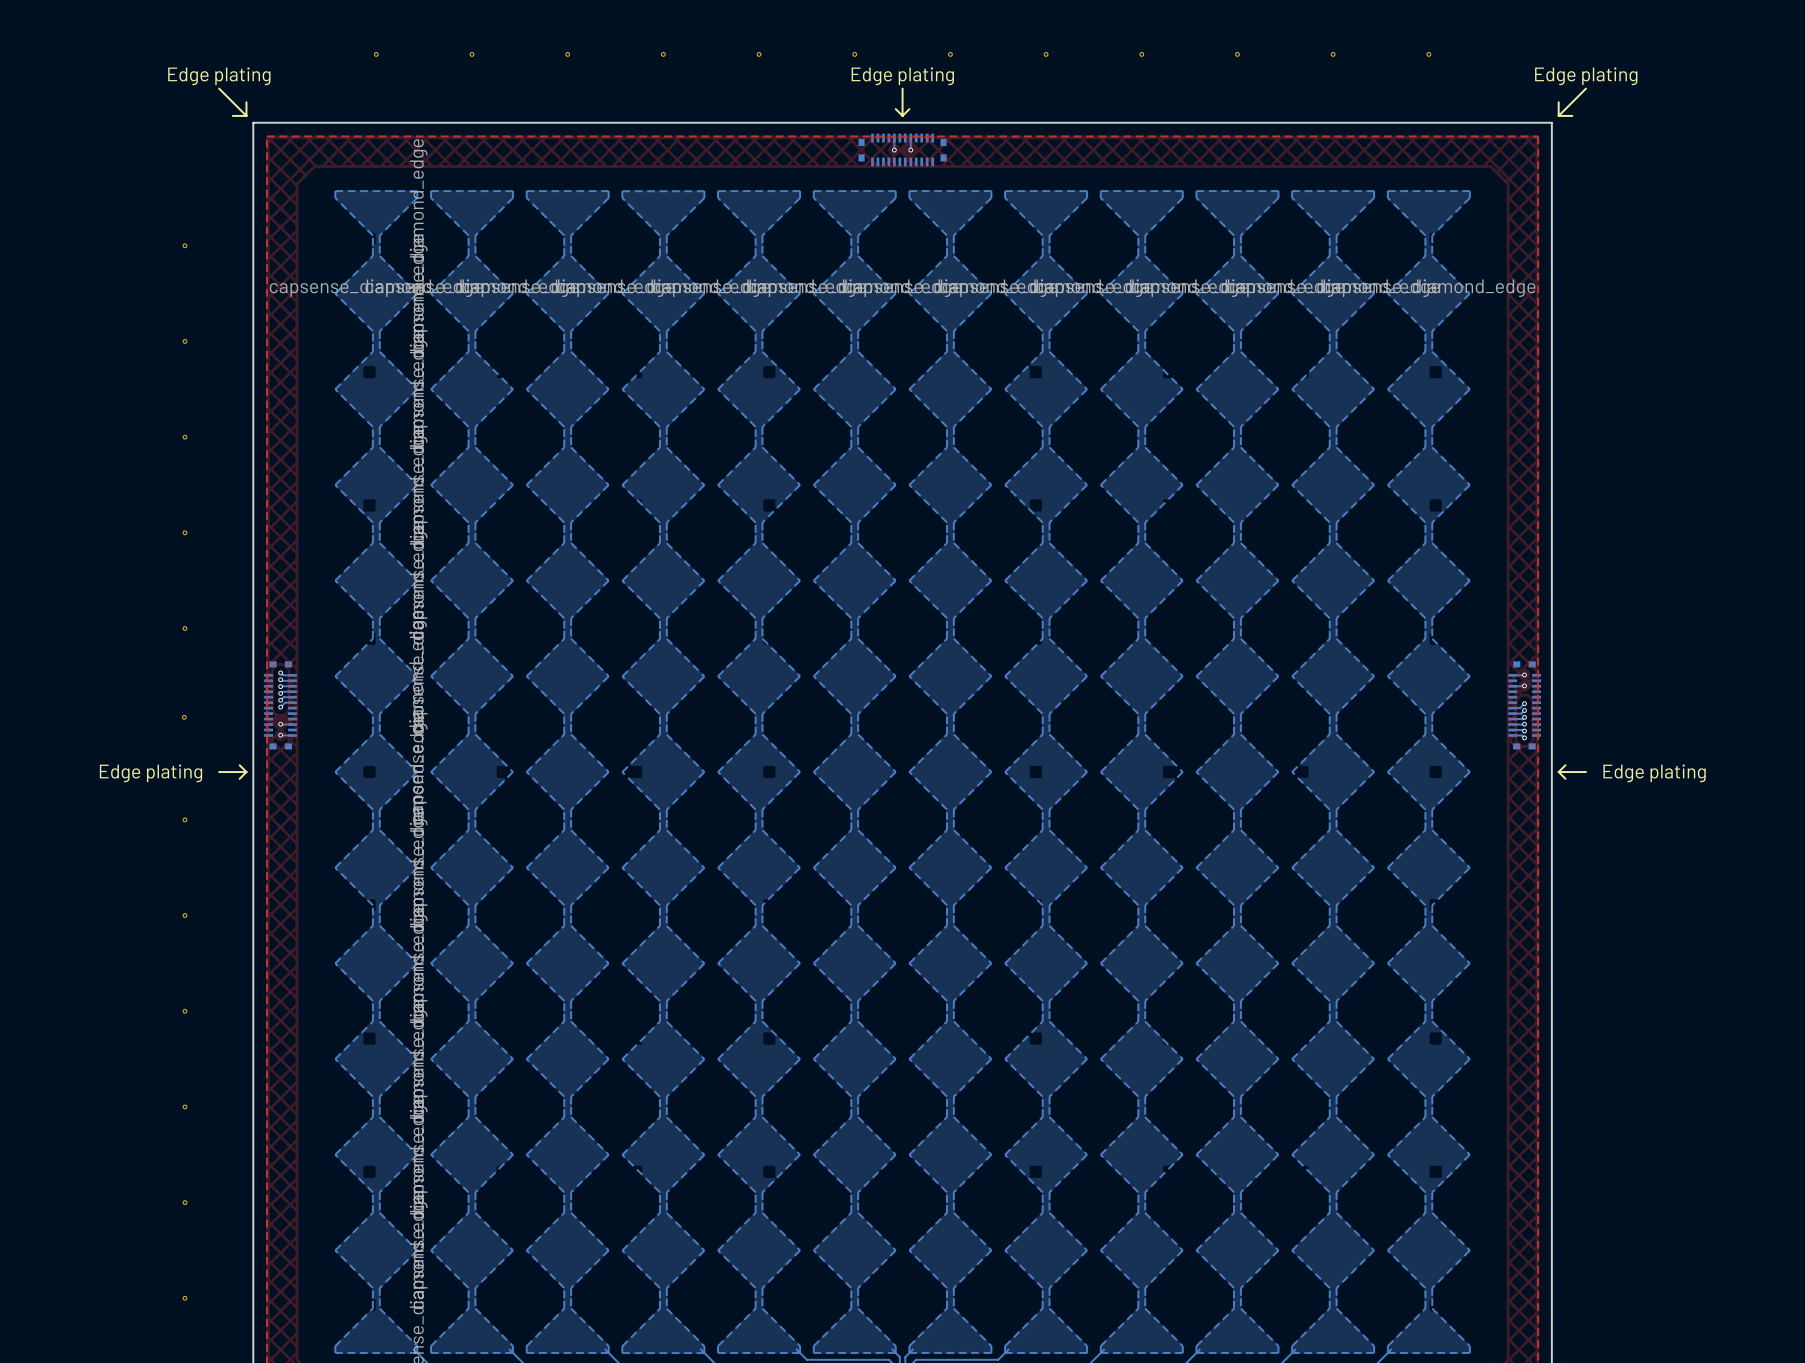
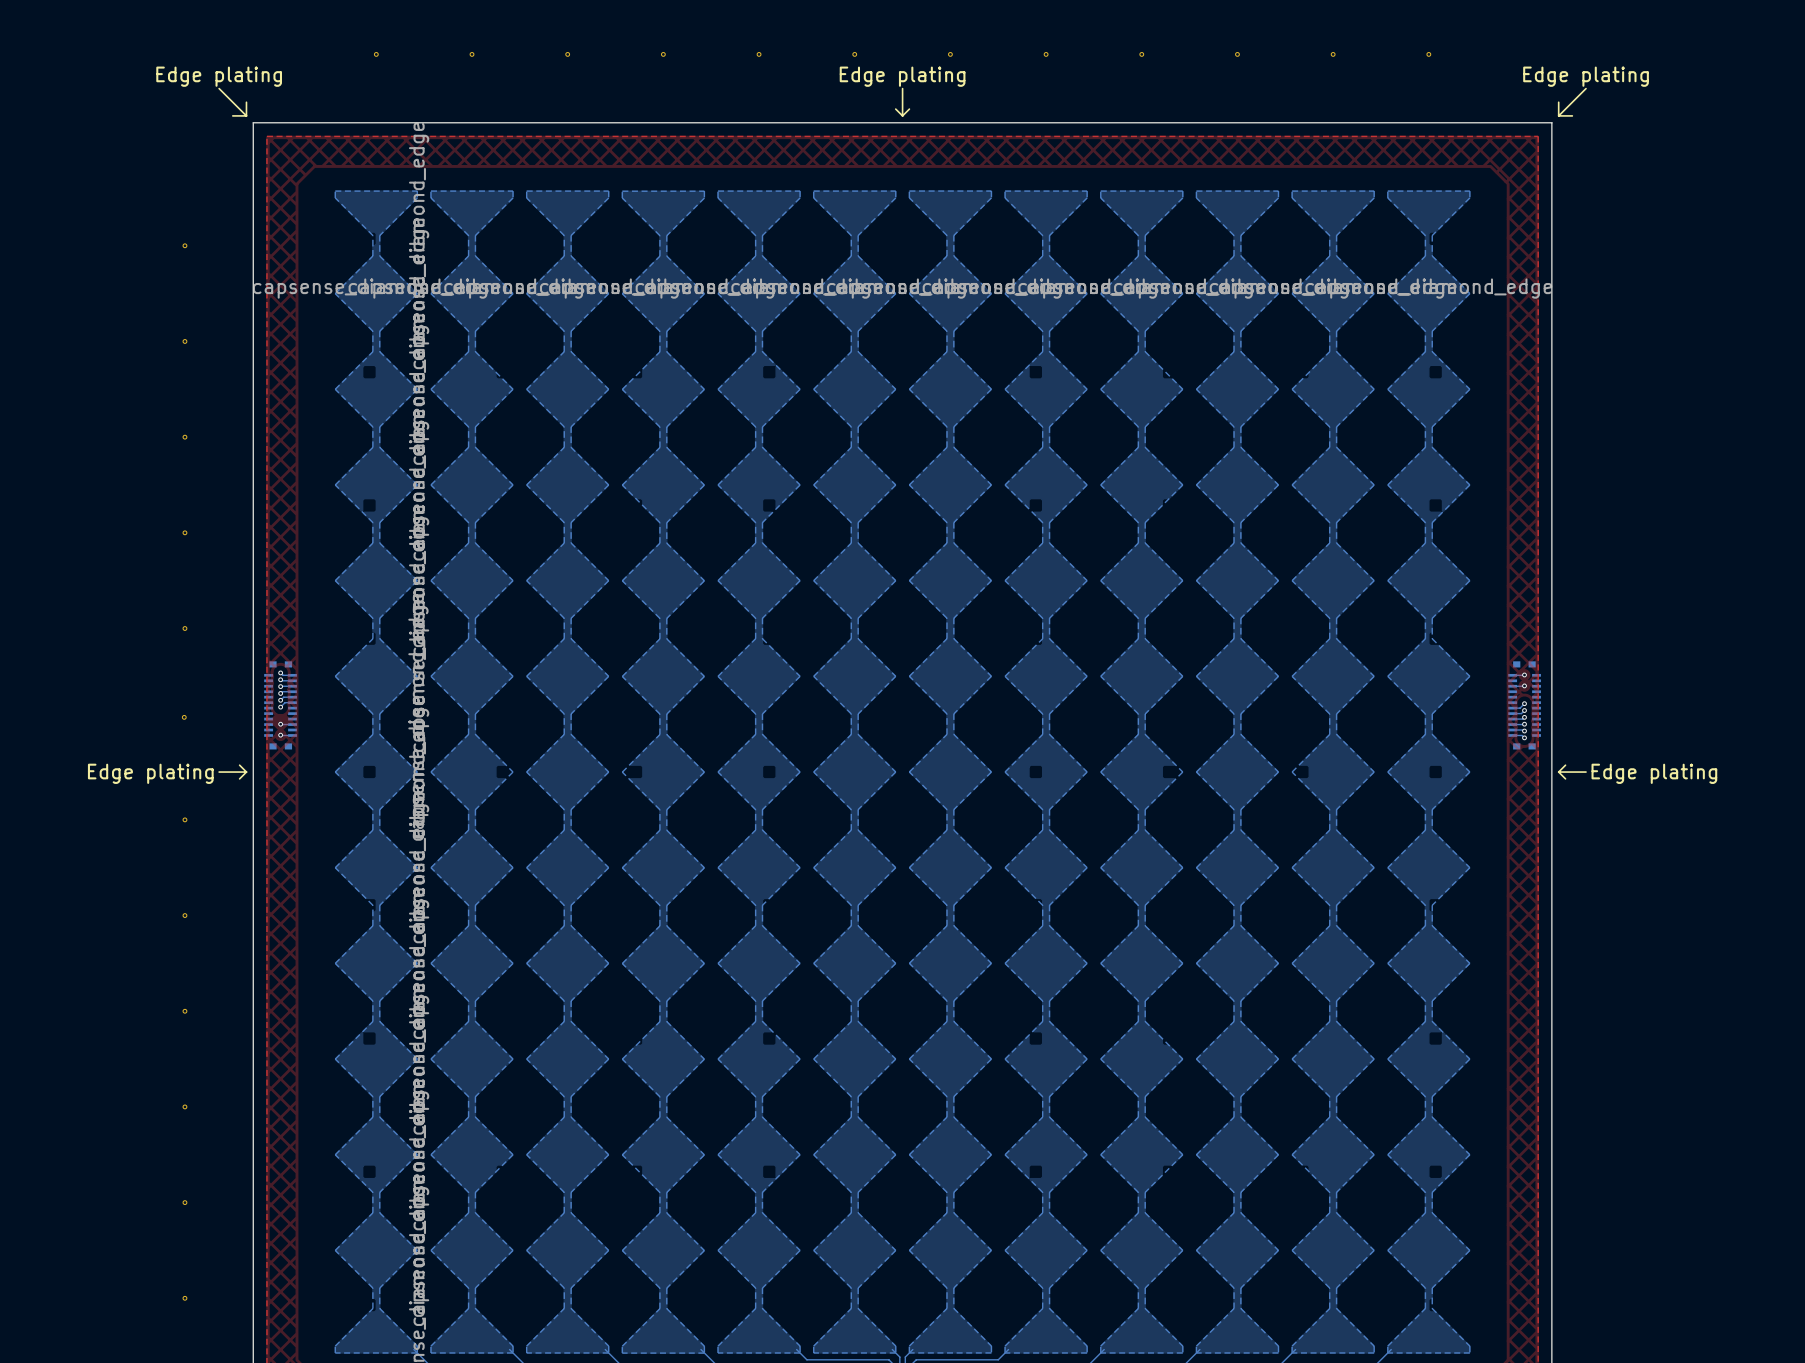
bottom track: (894, 138) (894, 150) -> none
bottom track: (910, 138) (910, 150) -> none
via: (894, 150) -> none
part: (902, 150) -> none
via: (910, 150) -> none

